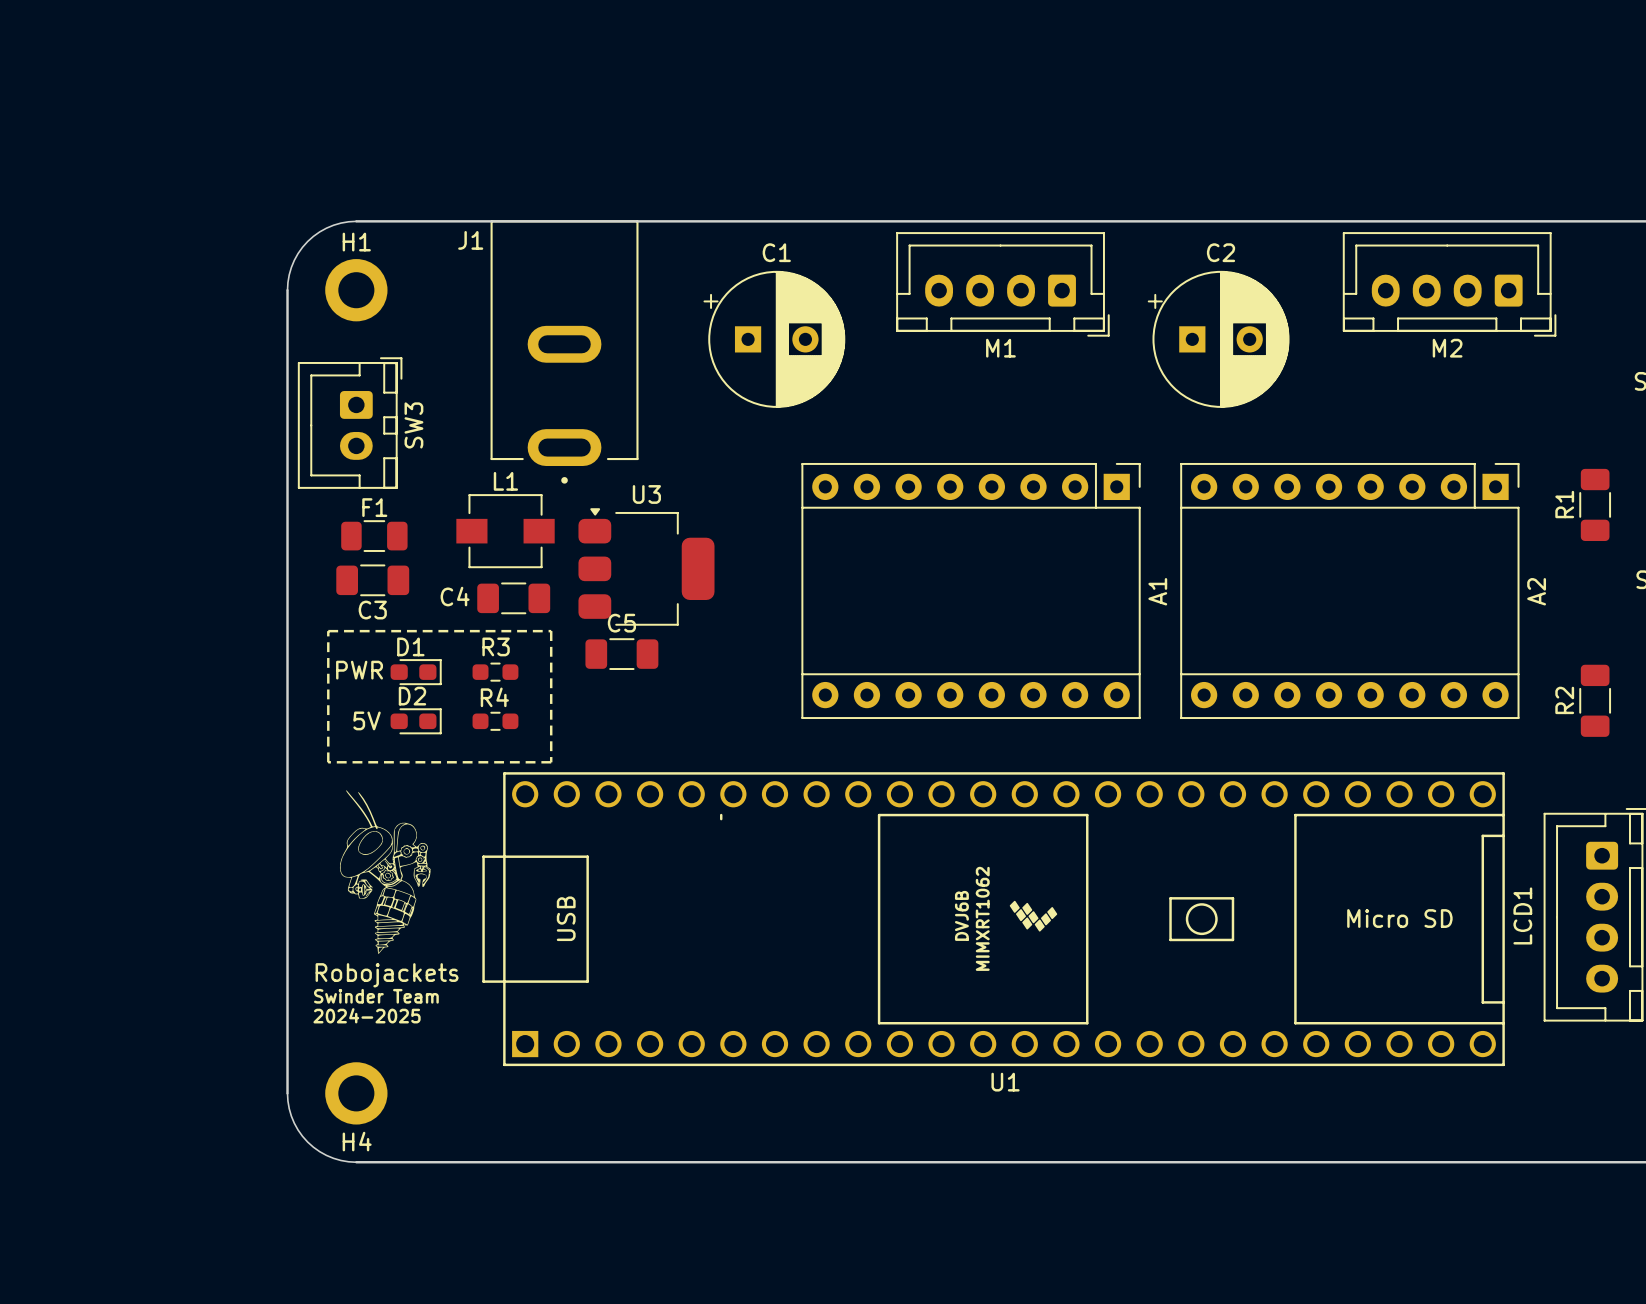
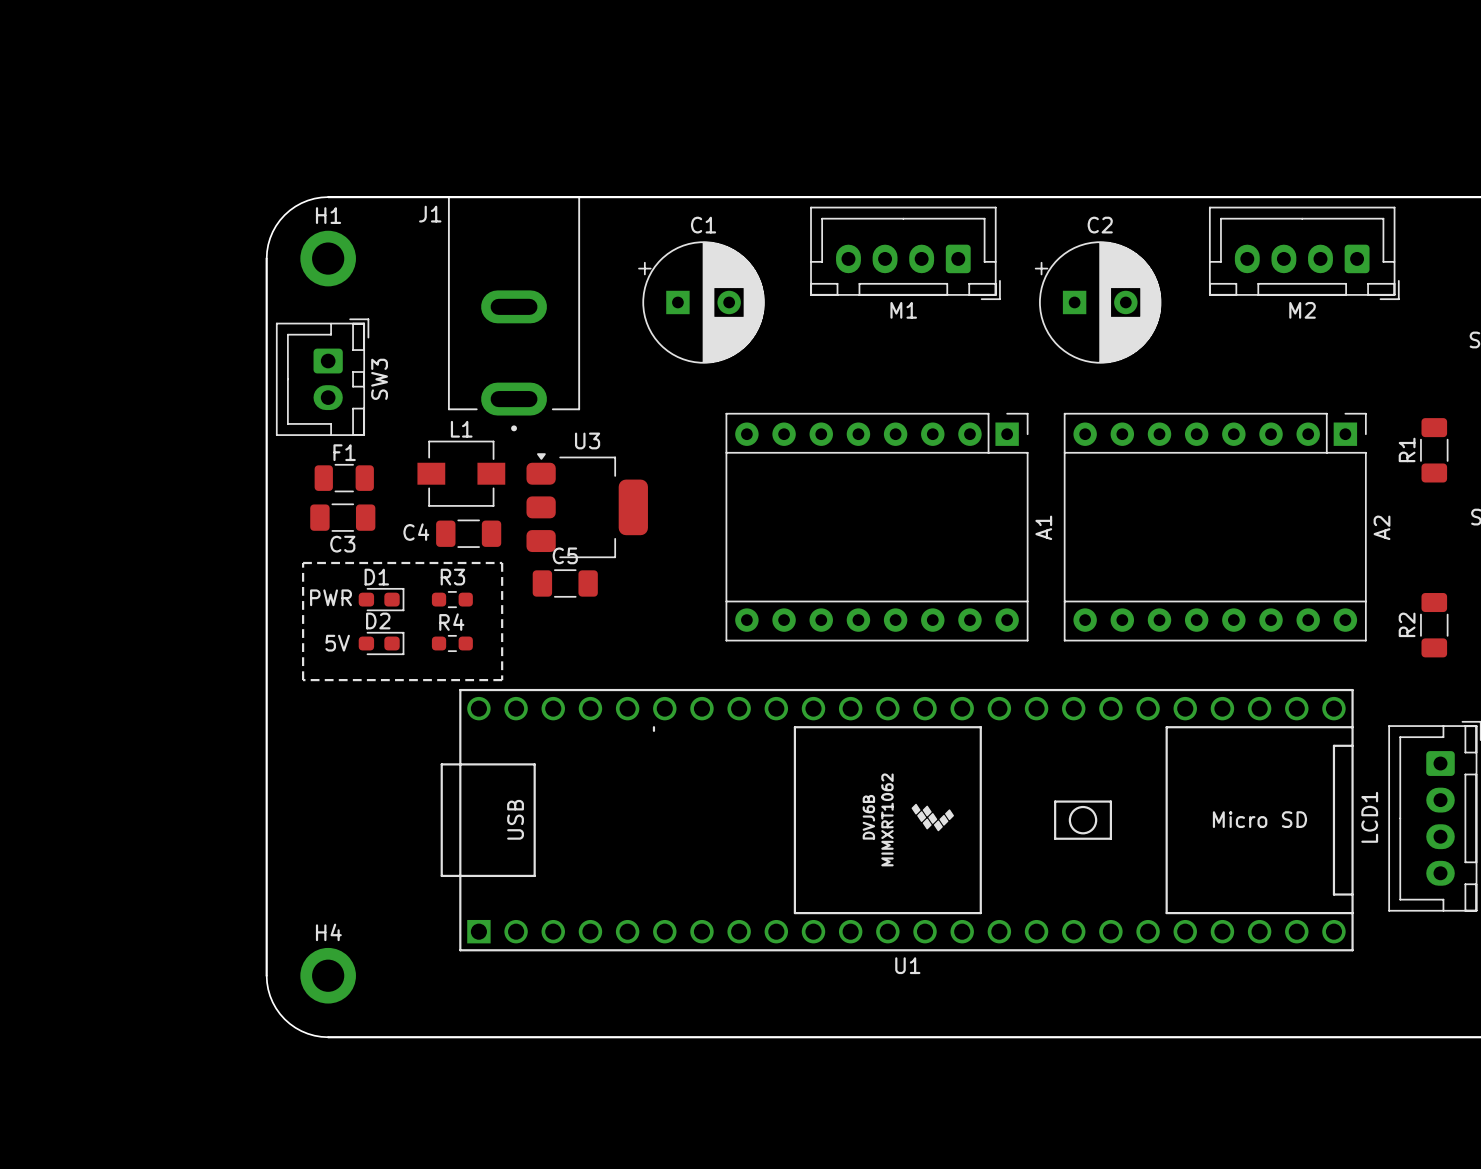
drawing: [339, 790, 431, 955] -> none
text: Robojackets (387, 975) -> none
text: Swinder Team (376, 996) -> none
text: 2024-2025 (367, 1015) -> none
H4 name position: H4 (357, 1141) -> H4 (328, 932)

